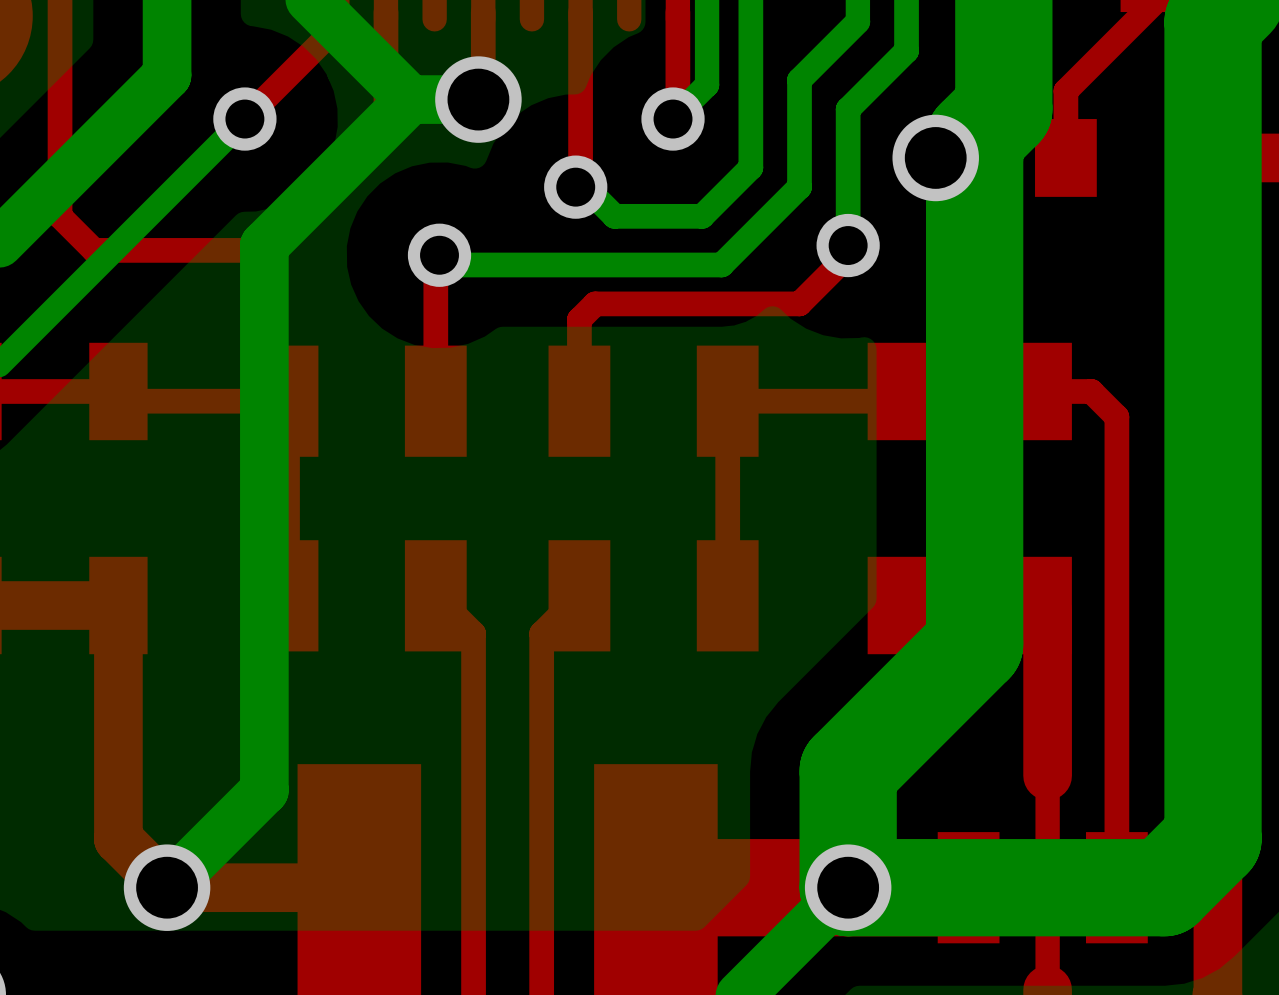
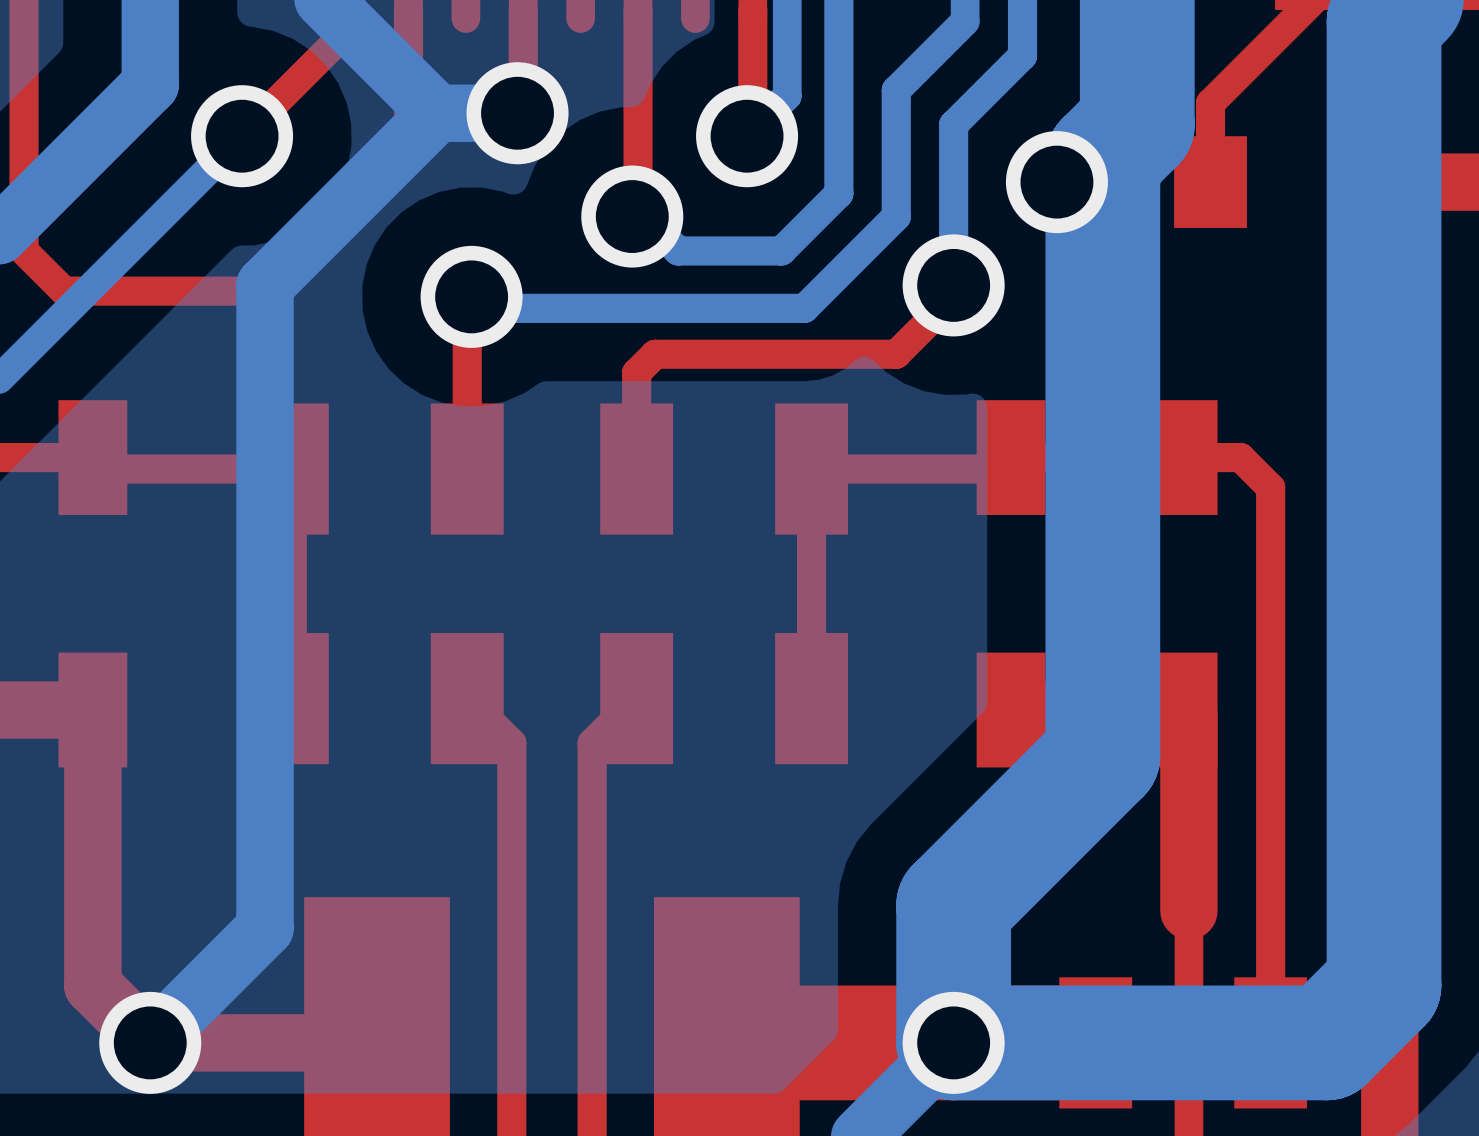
via size: [213, 87, 277, 151] -> [191, 85, 294, 188]
via size: [641, 87, 705, 151] -> [696, 85, 799, 188]
via size: [544, 155, 608, 219] -> [581, 165, 684, 268]
via size: [816, 213, 880, 278] -> [902, 234, 1005, 337]
via size: [407, 223, 472, 287] -> [420, 245, 523, 348]

